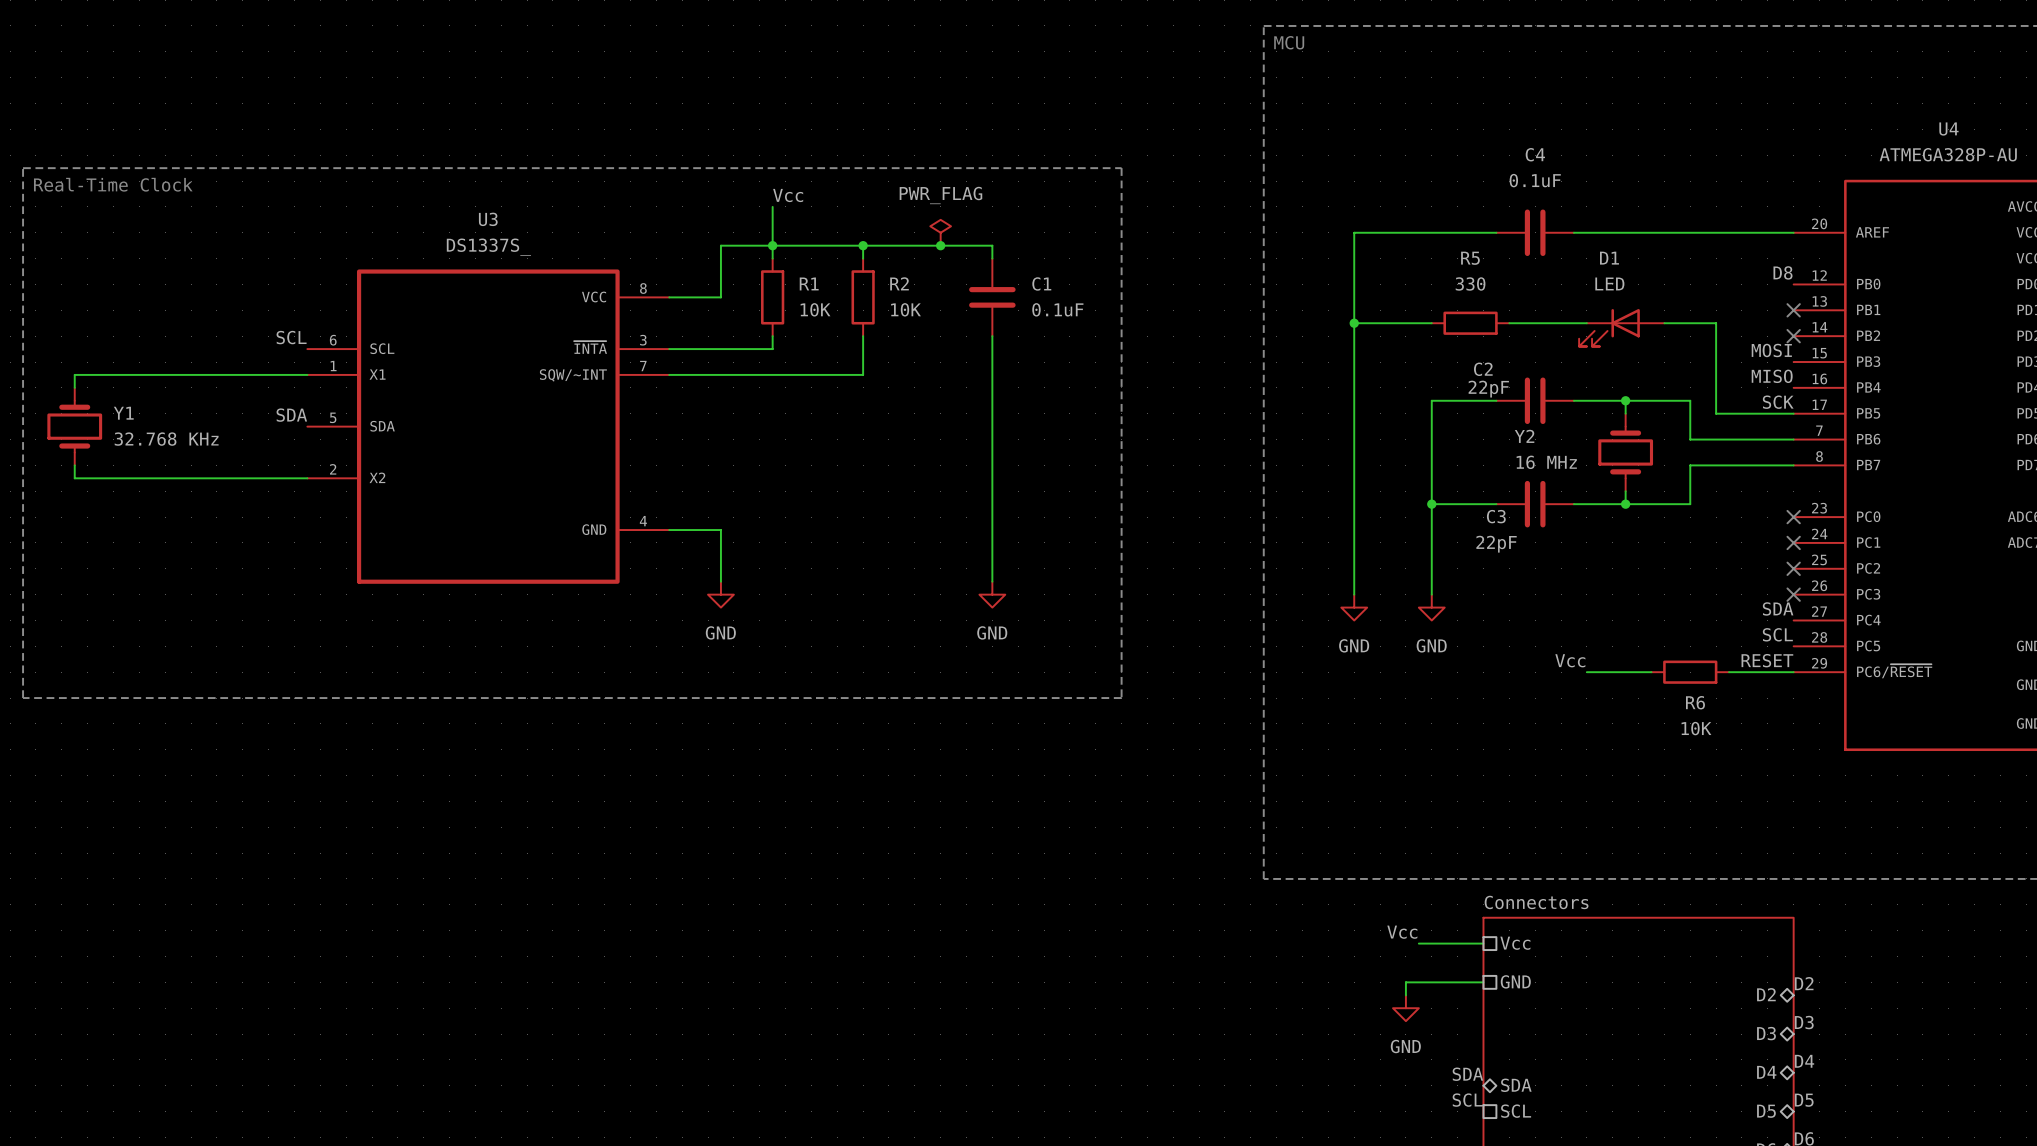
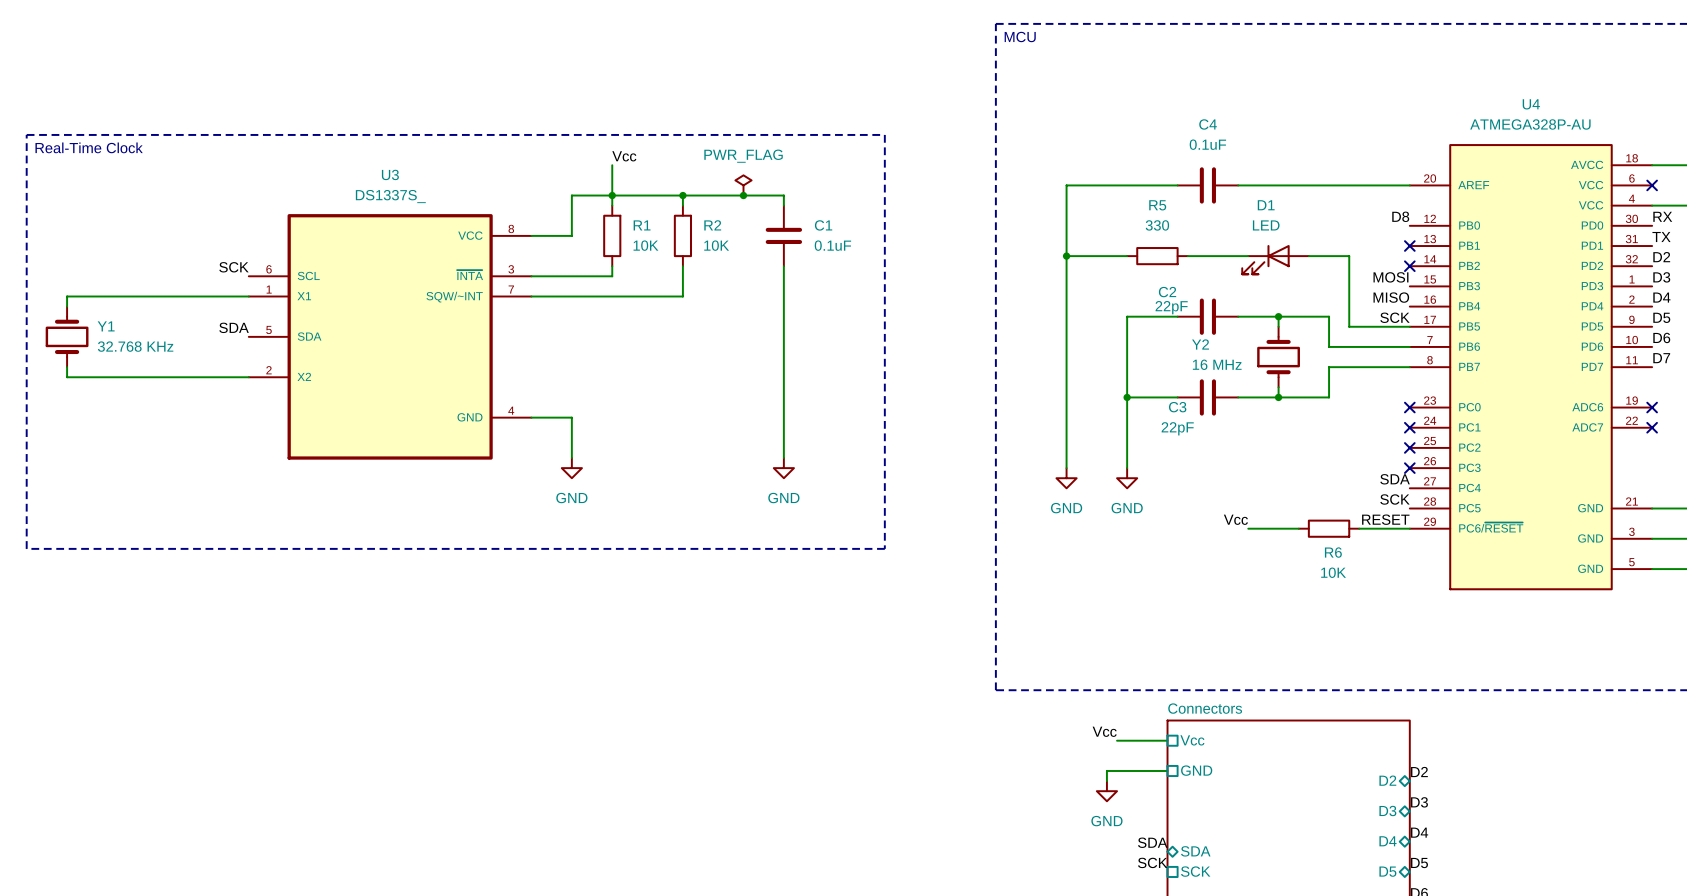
label: SCL (291, 337) -> SCK (233, 267)
label: SCL (1777, 634) -> SCK (1394, 499)
label: SCL (1467, 1100) -> SCK (1152, 862)
sheet pin: SCL (1516, 1111) -> SCK (1195, 871)

